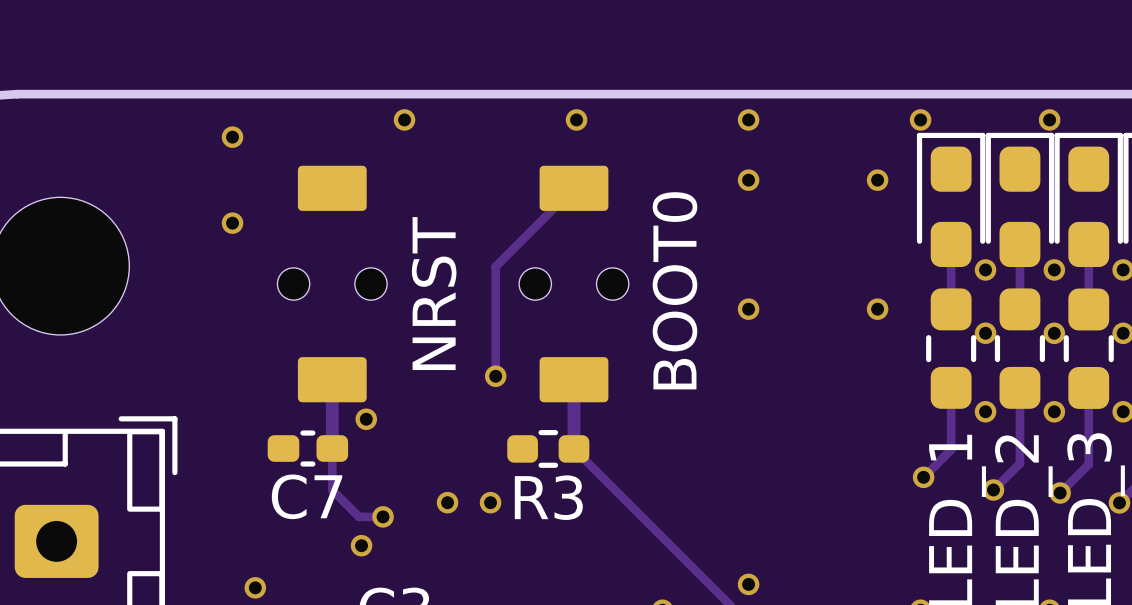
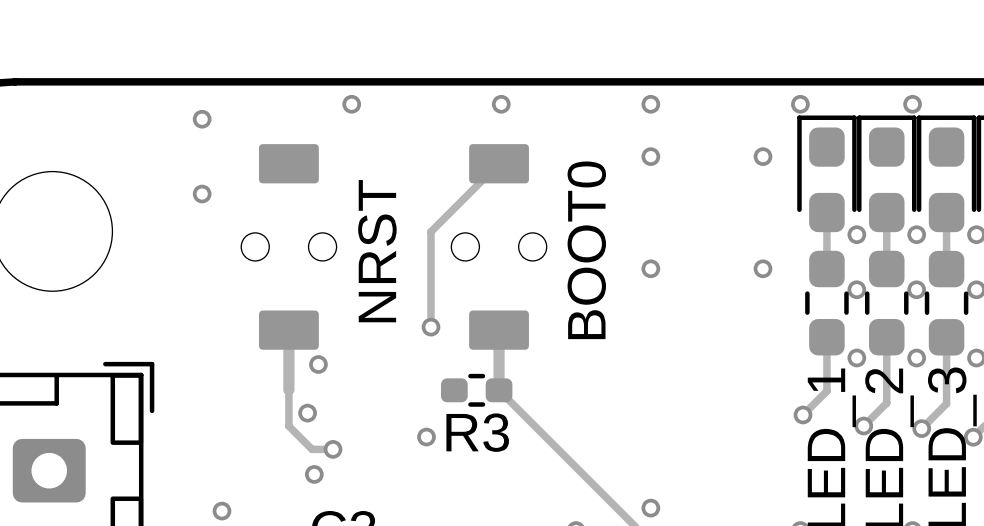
C7: (307, 448) -> none
via position: (447, 502) -> (307, 413)

